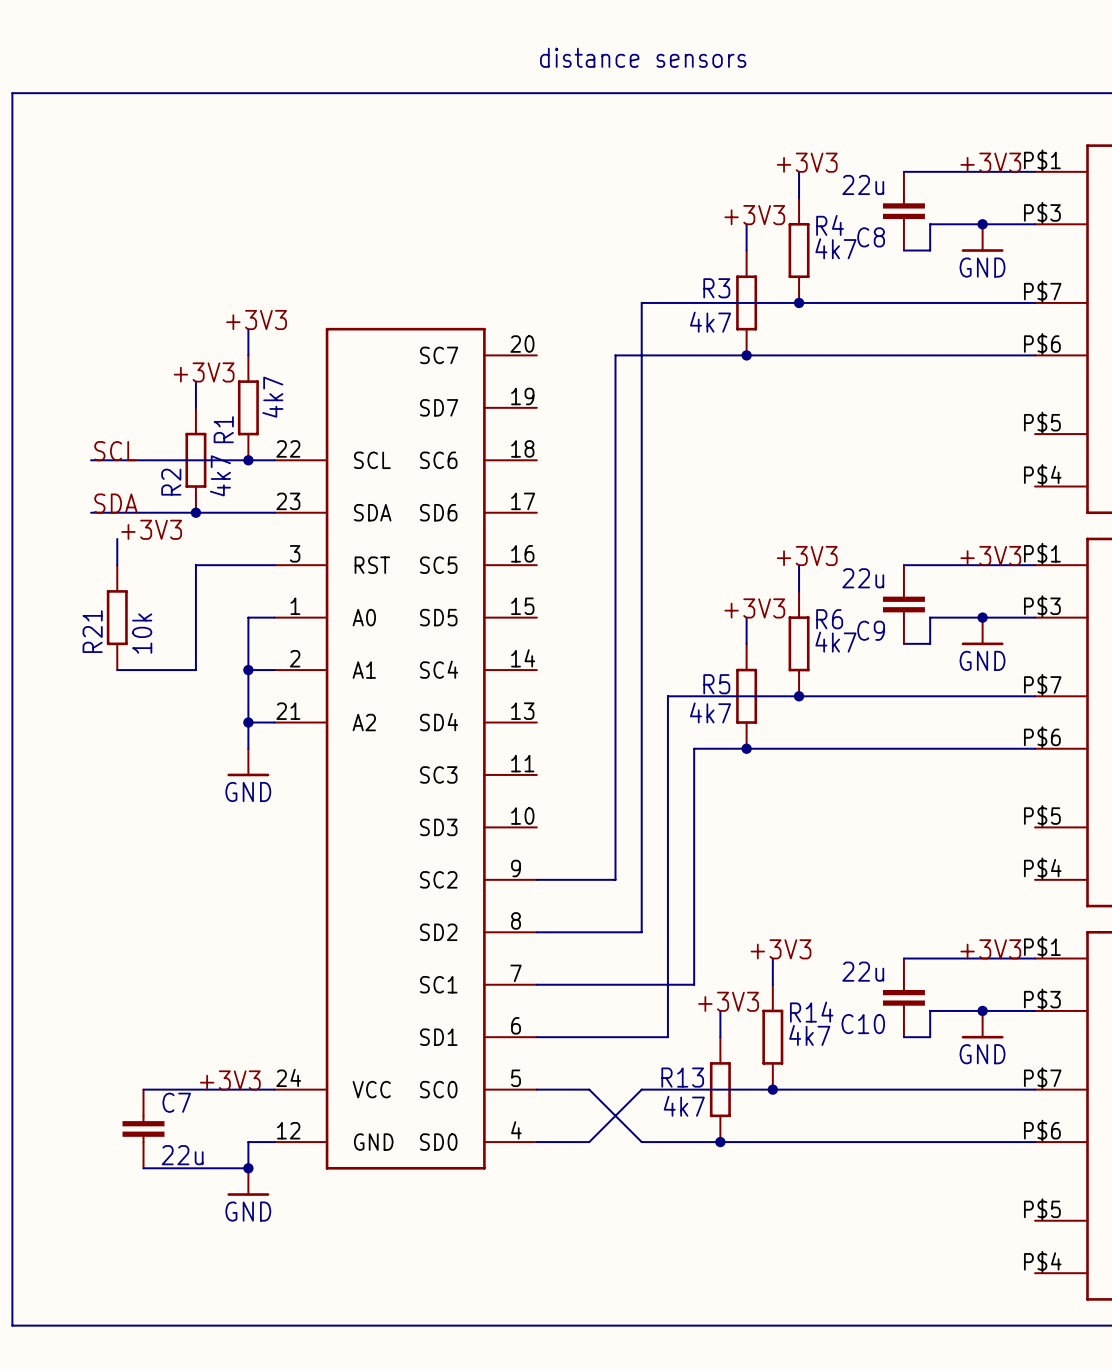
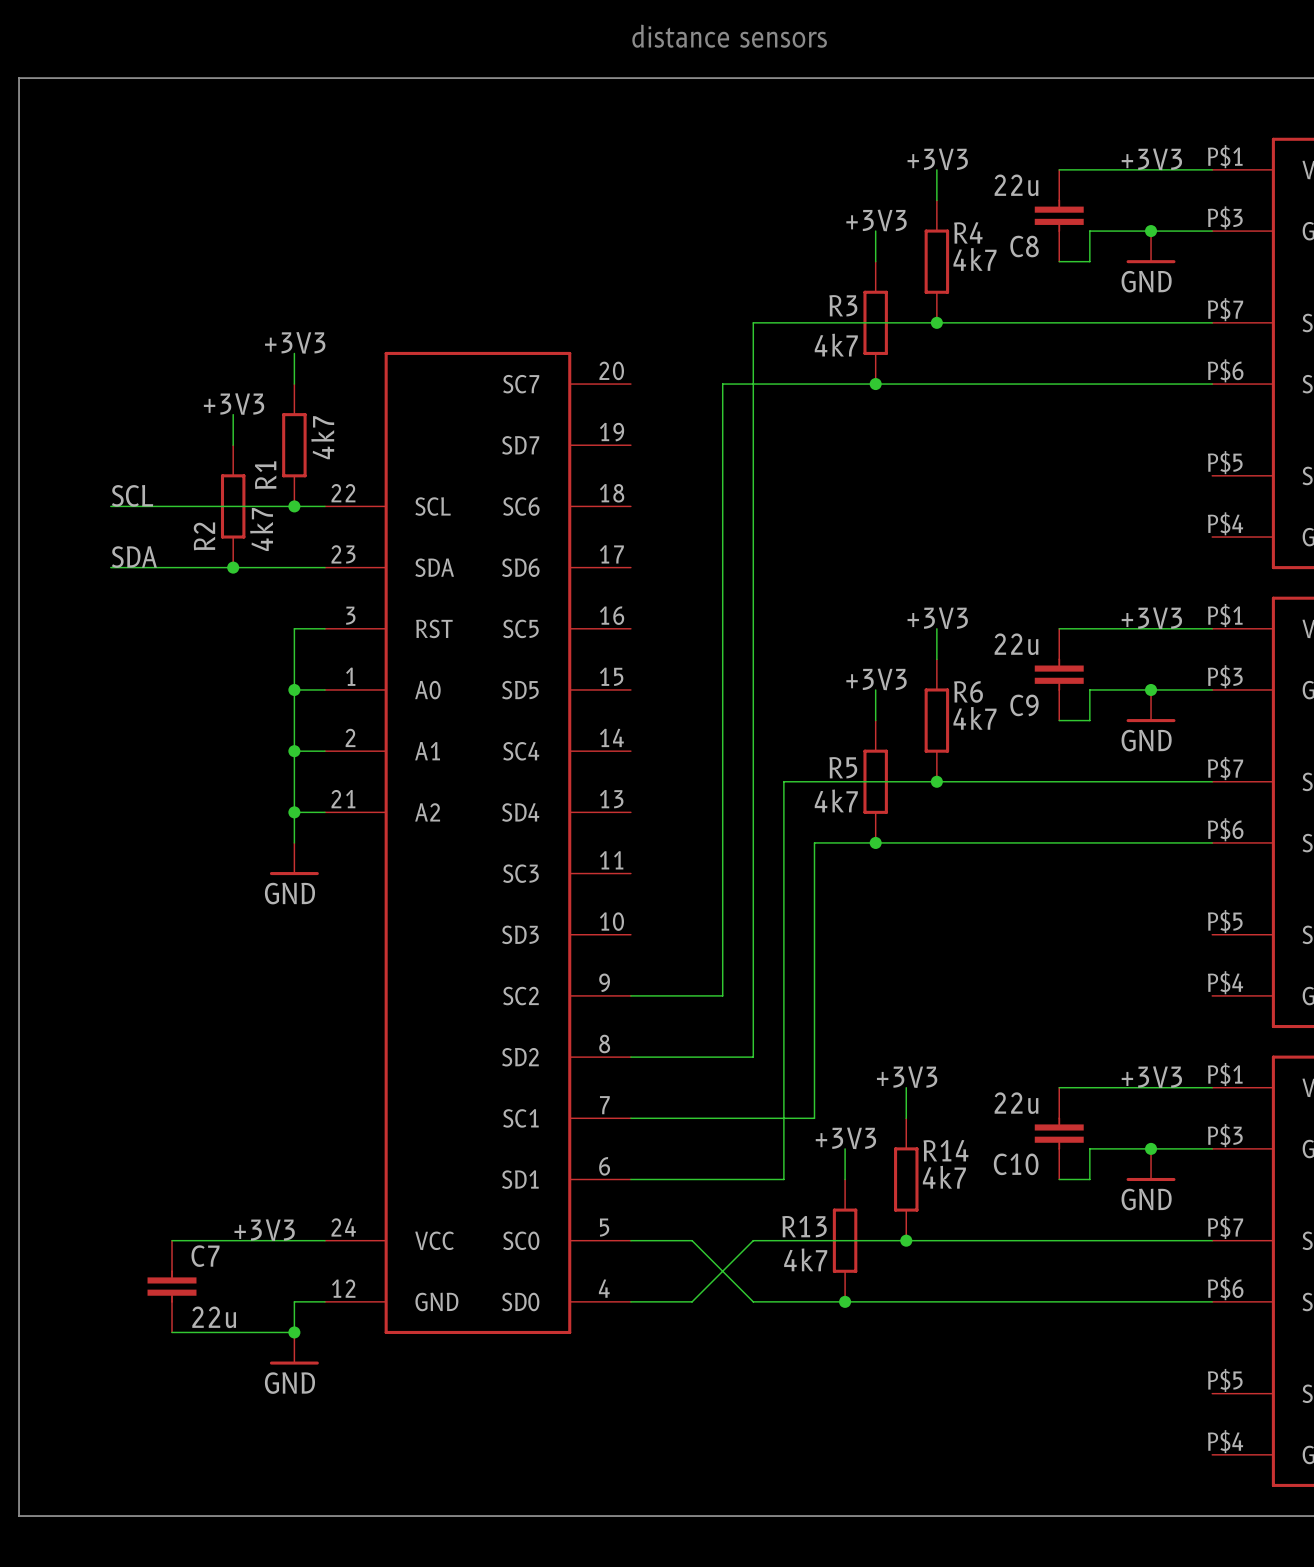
label: +3V3 (151, 529) -> none
wire: (117, 538) (117, 565) -> none
wire: (248, 565) (195, 565) (195, 670) (117, 670) -> (294, 628) (294, 689)
R21: 10k (117, 617) -> none
junction: none -> (294, 689)

